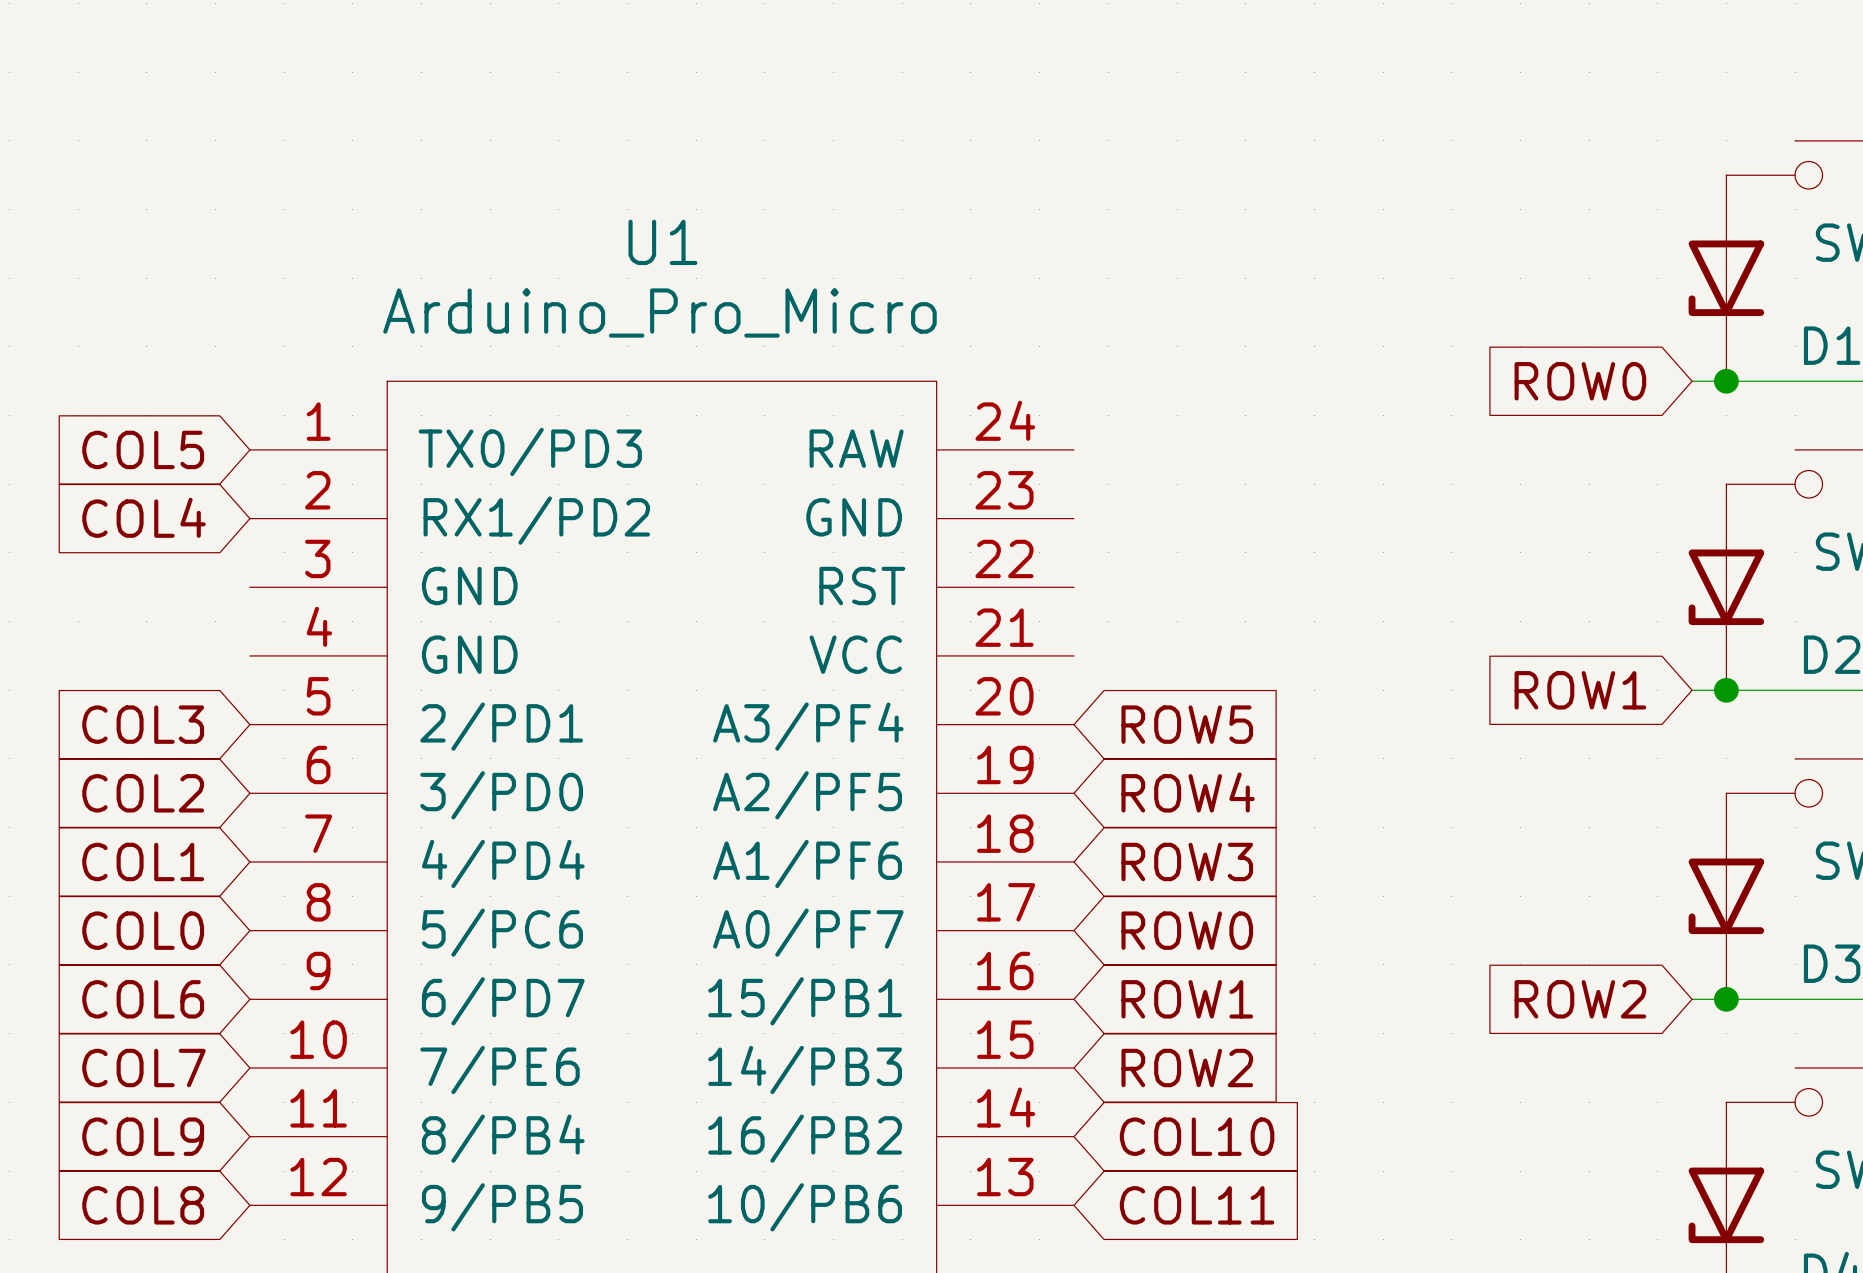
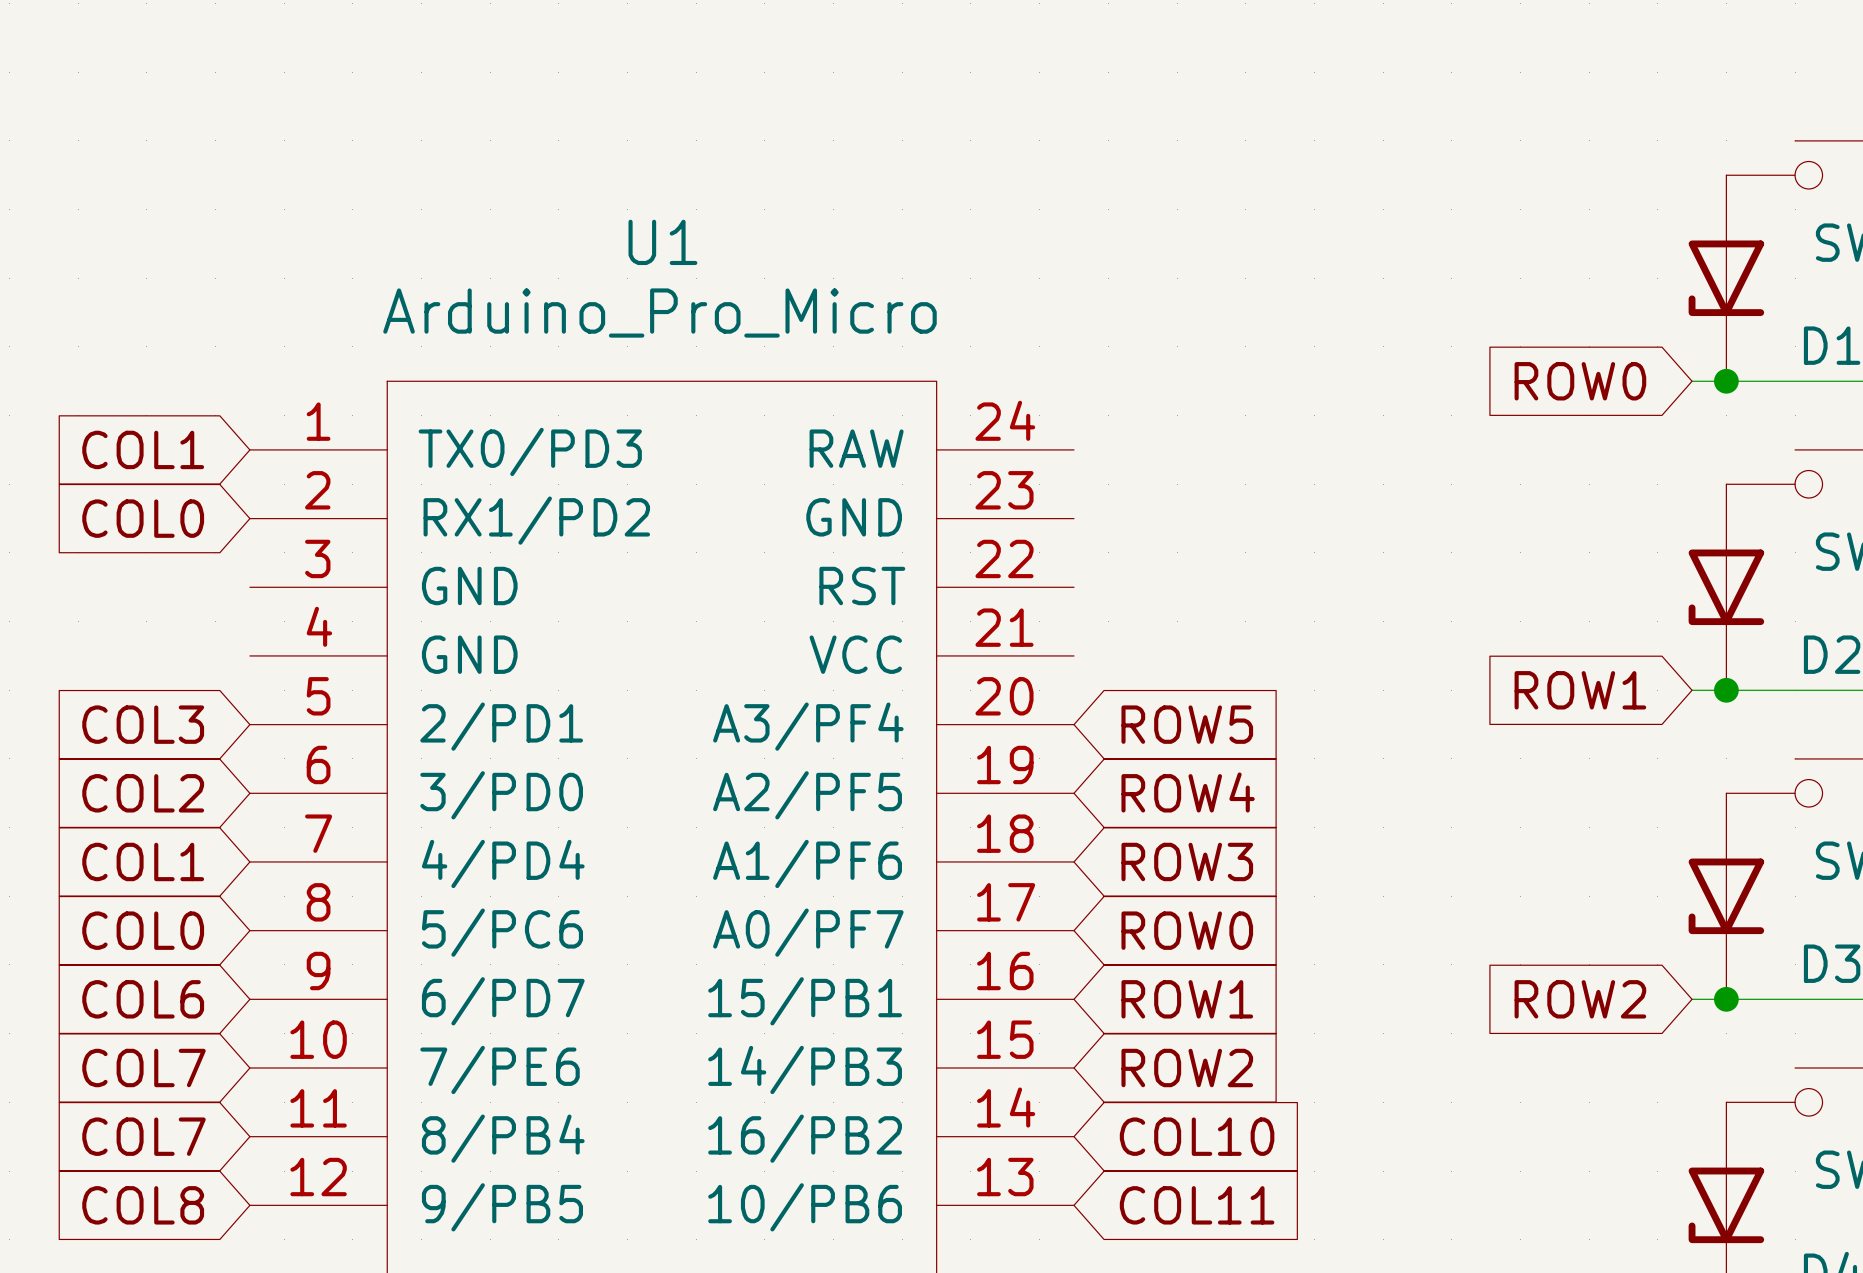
global label: COL5 (143, 449) -> COL1 (143, 449)
global label: COL4 (143, 517) -> COL0 (143, 518)
global label: COL9 (143, 1136) -> COL7 (143, 1136)

